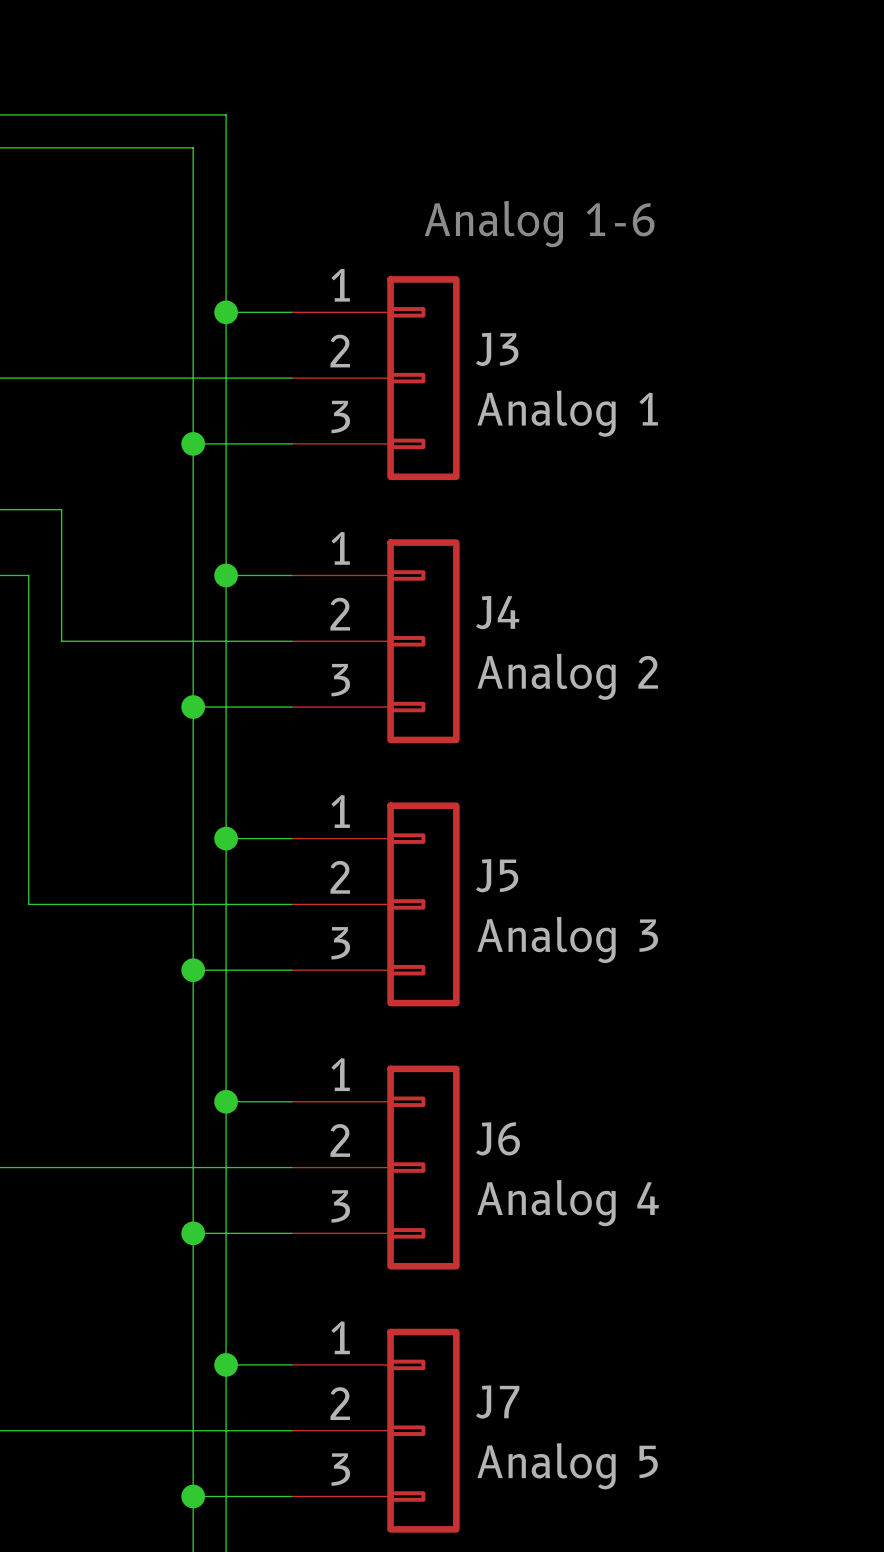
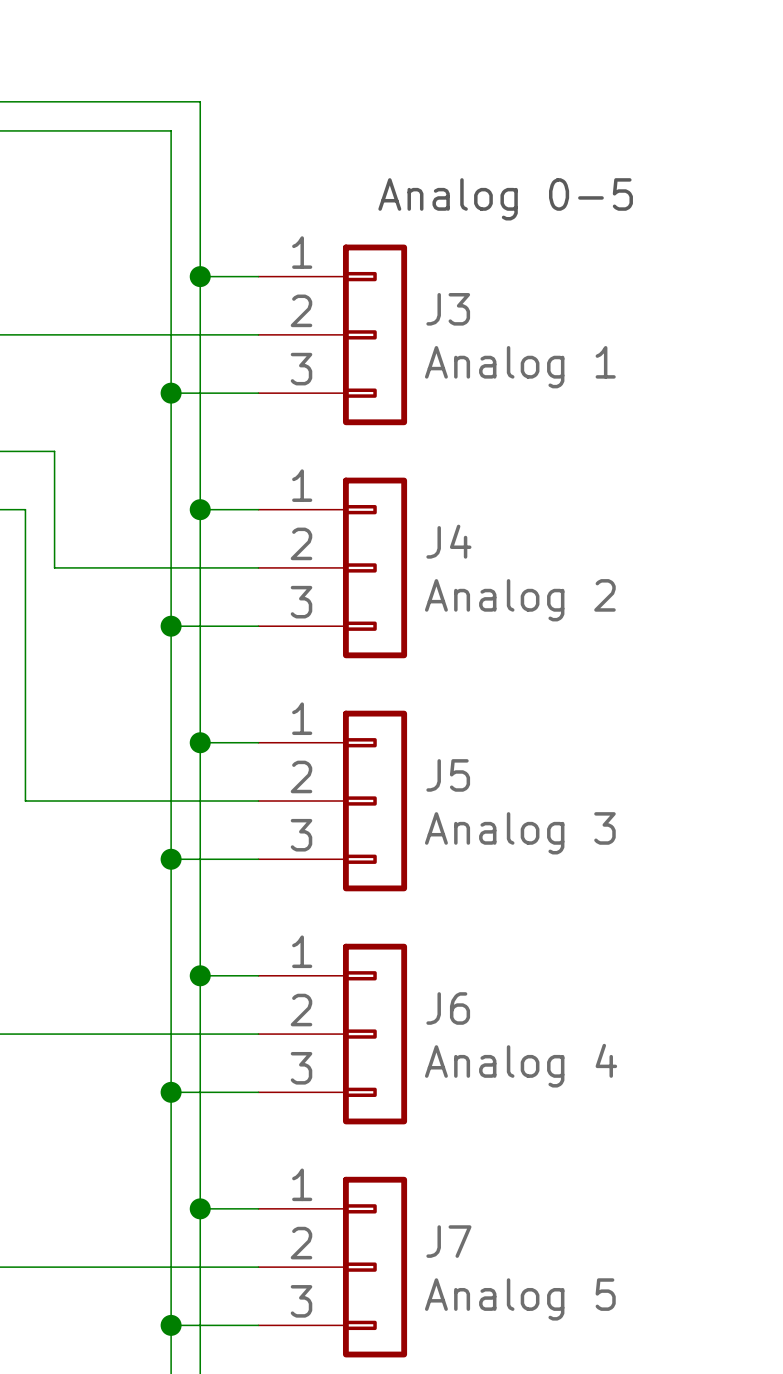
text: Analog 1-6 (539, 224) -> Analog 0-5 (505, 199)

